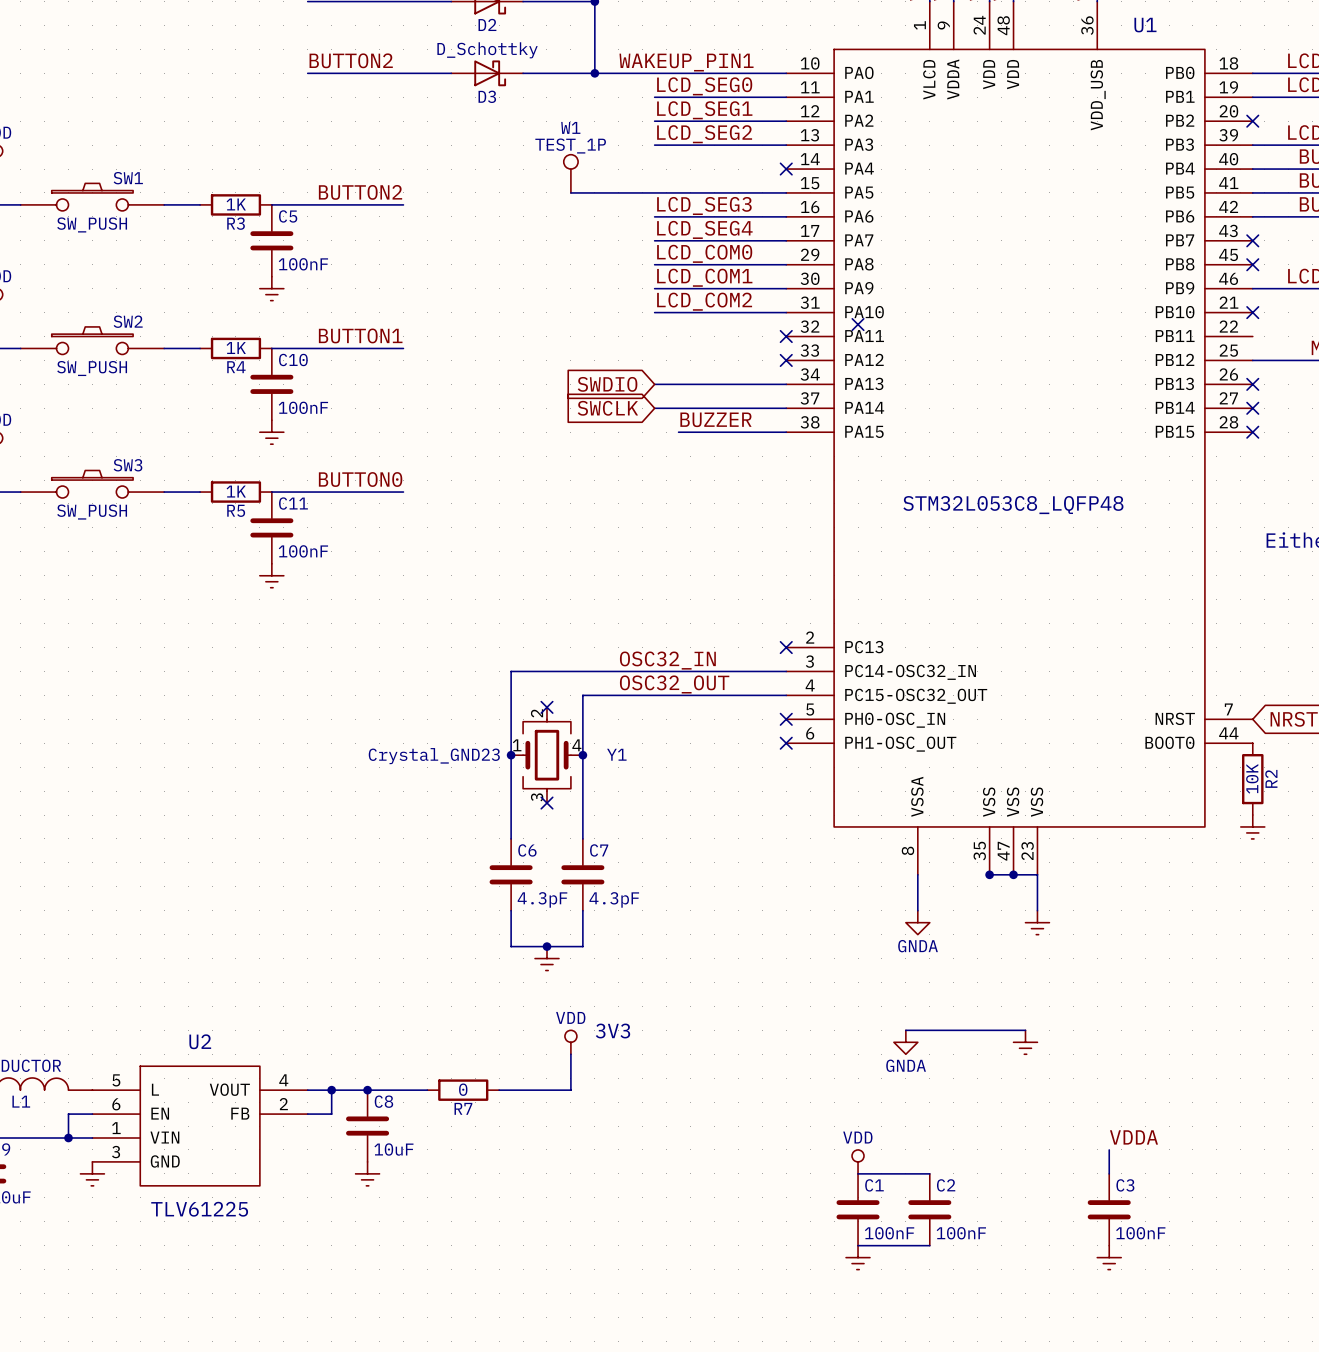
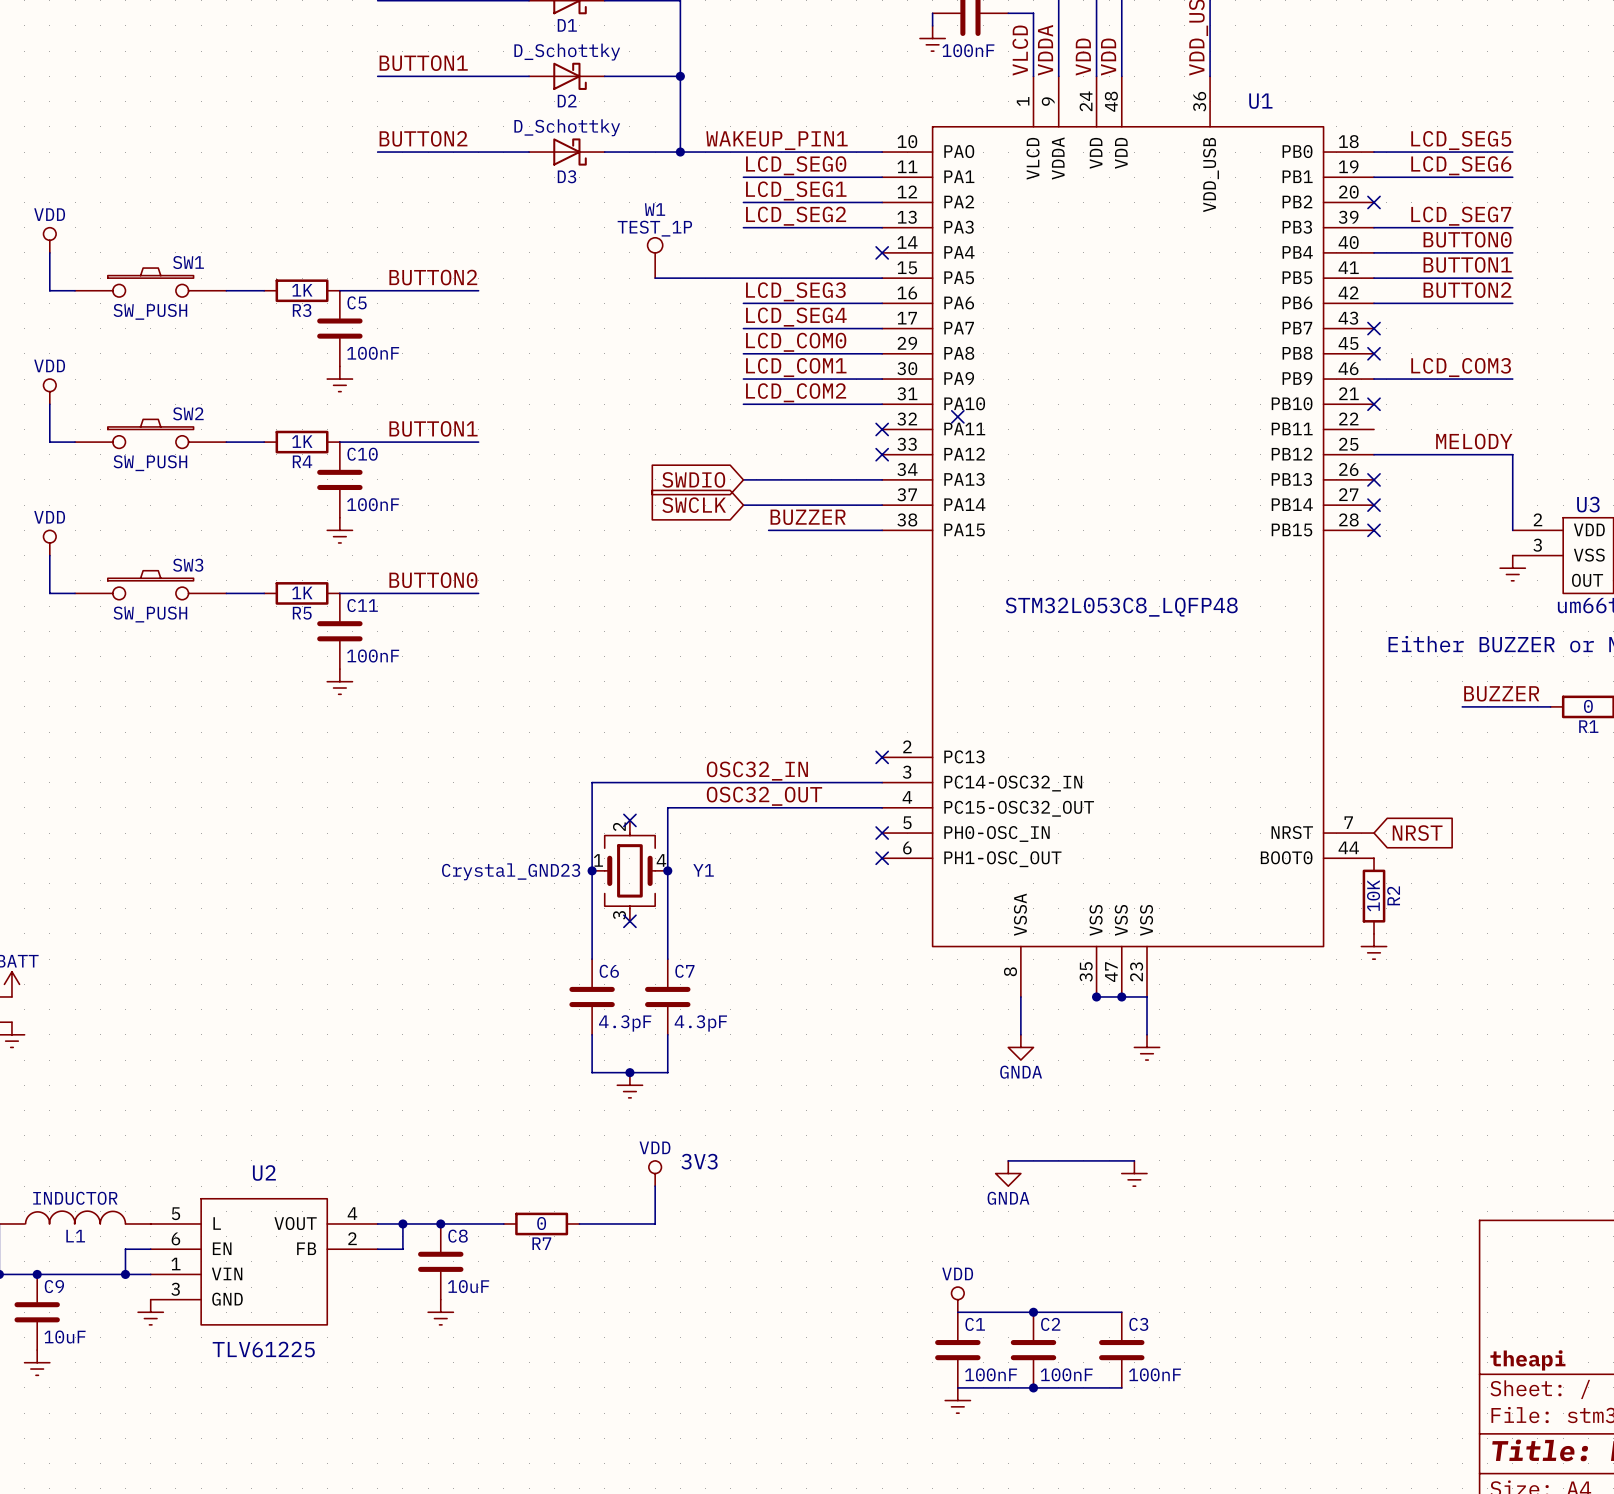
label: VDDA (1133, 1137) -> none
wire: (1109, 1149) (1109, 1173) -> none
wire: none -> (1033, 1312) (1121, 1312)
junction: none -> (1033, 1312)
C3 position: (1109, 1209) -> (1121, 1350)
wire: none -> (1033, 1387) (1121, 1387)
junction: none -> (1033, 1387)
power symbol: (1109, 1257) -> none

